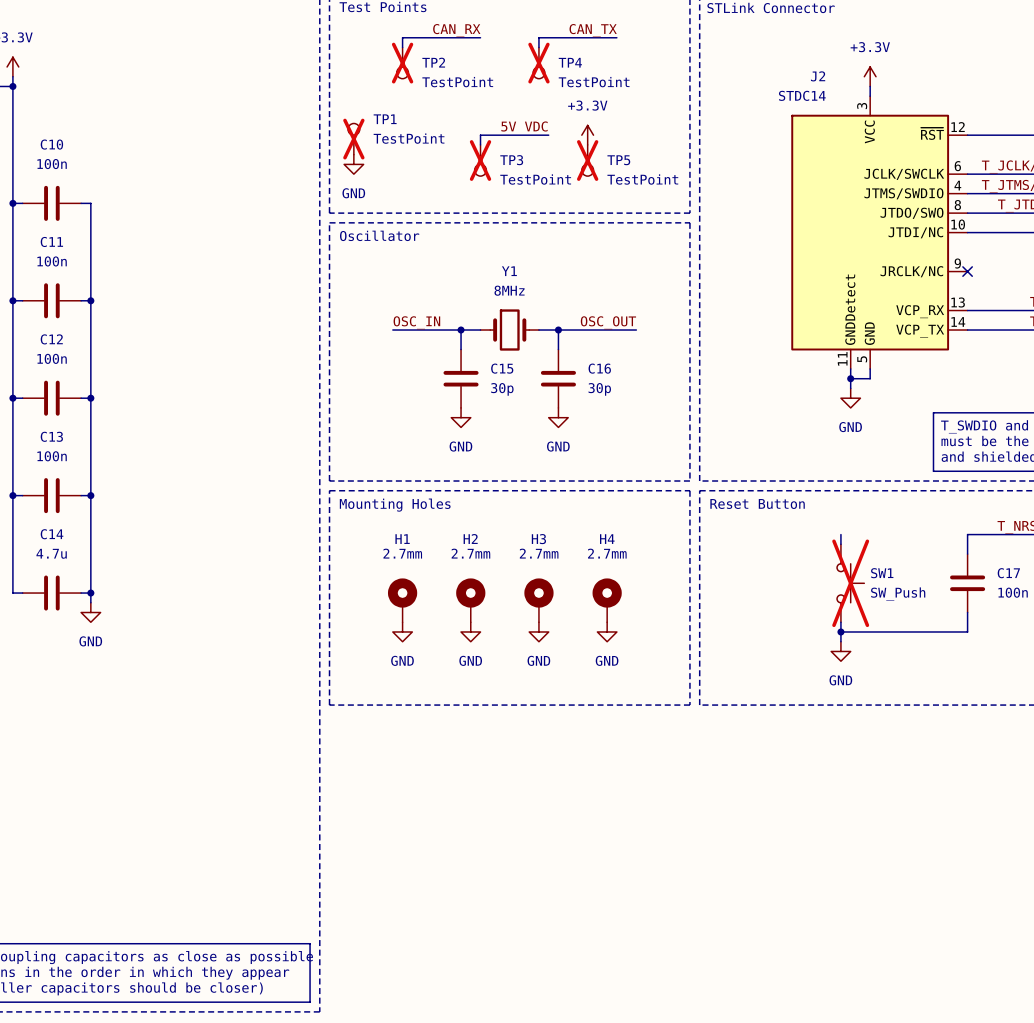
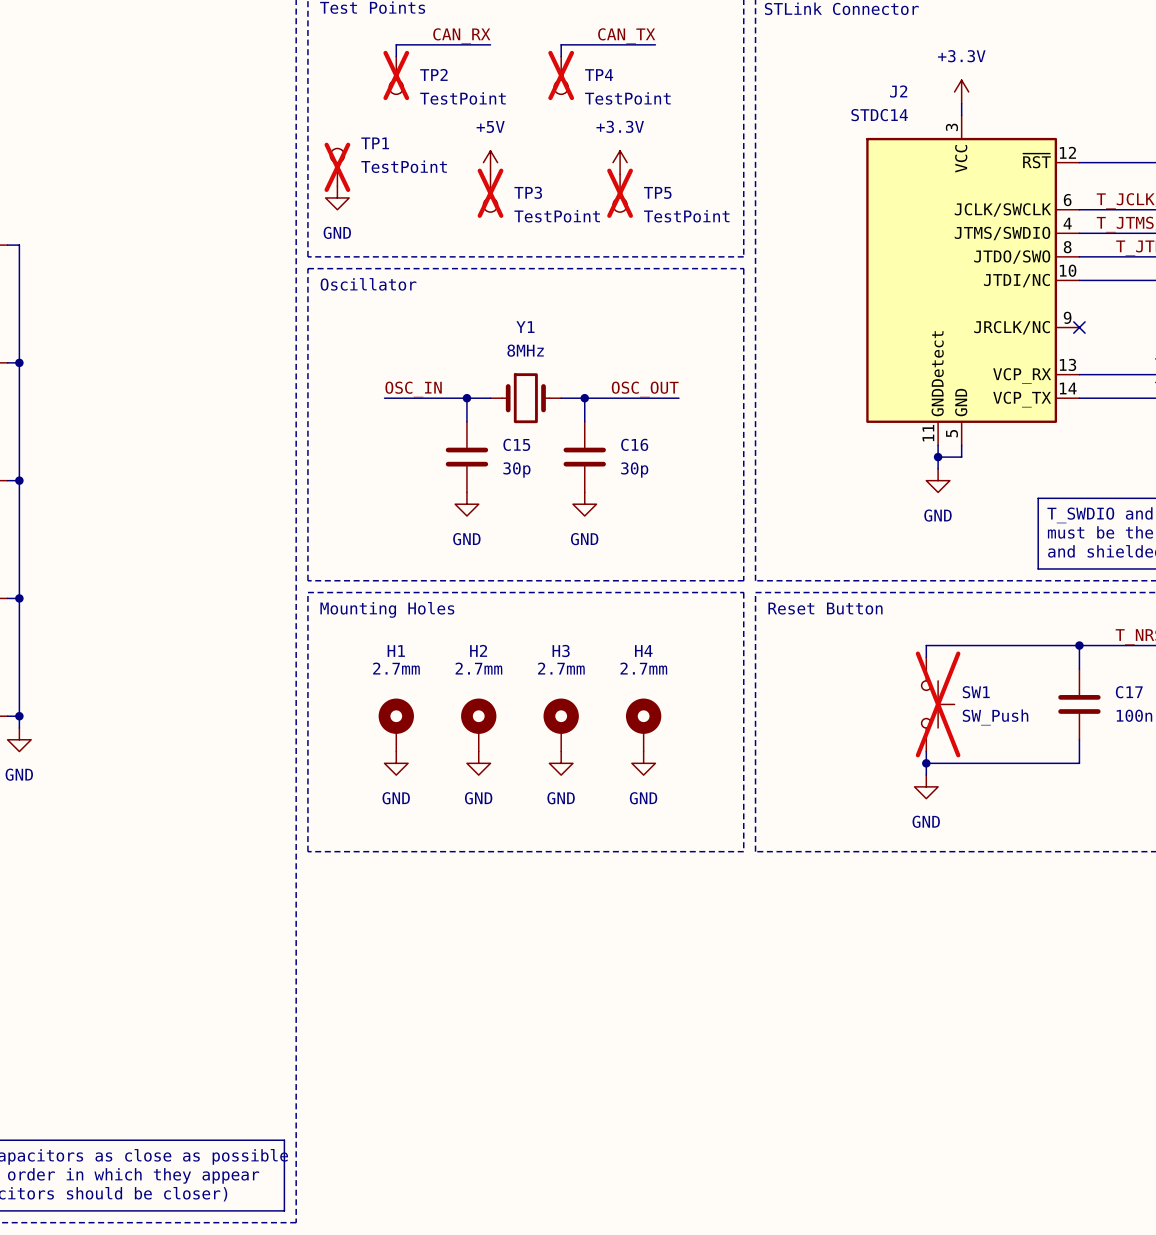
label: 5V VDC (524, 126) -> none
power symbol: none -> +5V (490, 162)
wire: (548, 135) (480, 135) (480, 144) -> none
wire: none -> (926, 645) (1079, 645)
junction: none -> (1079, 645)

